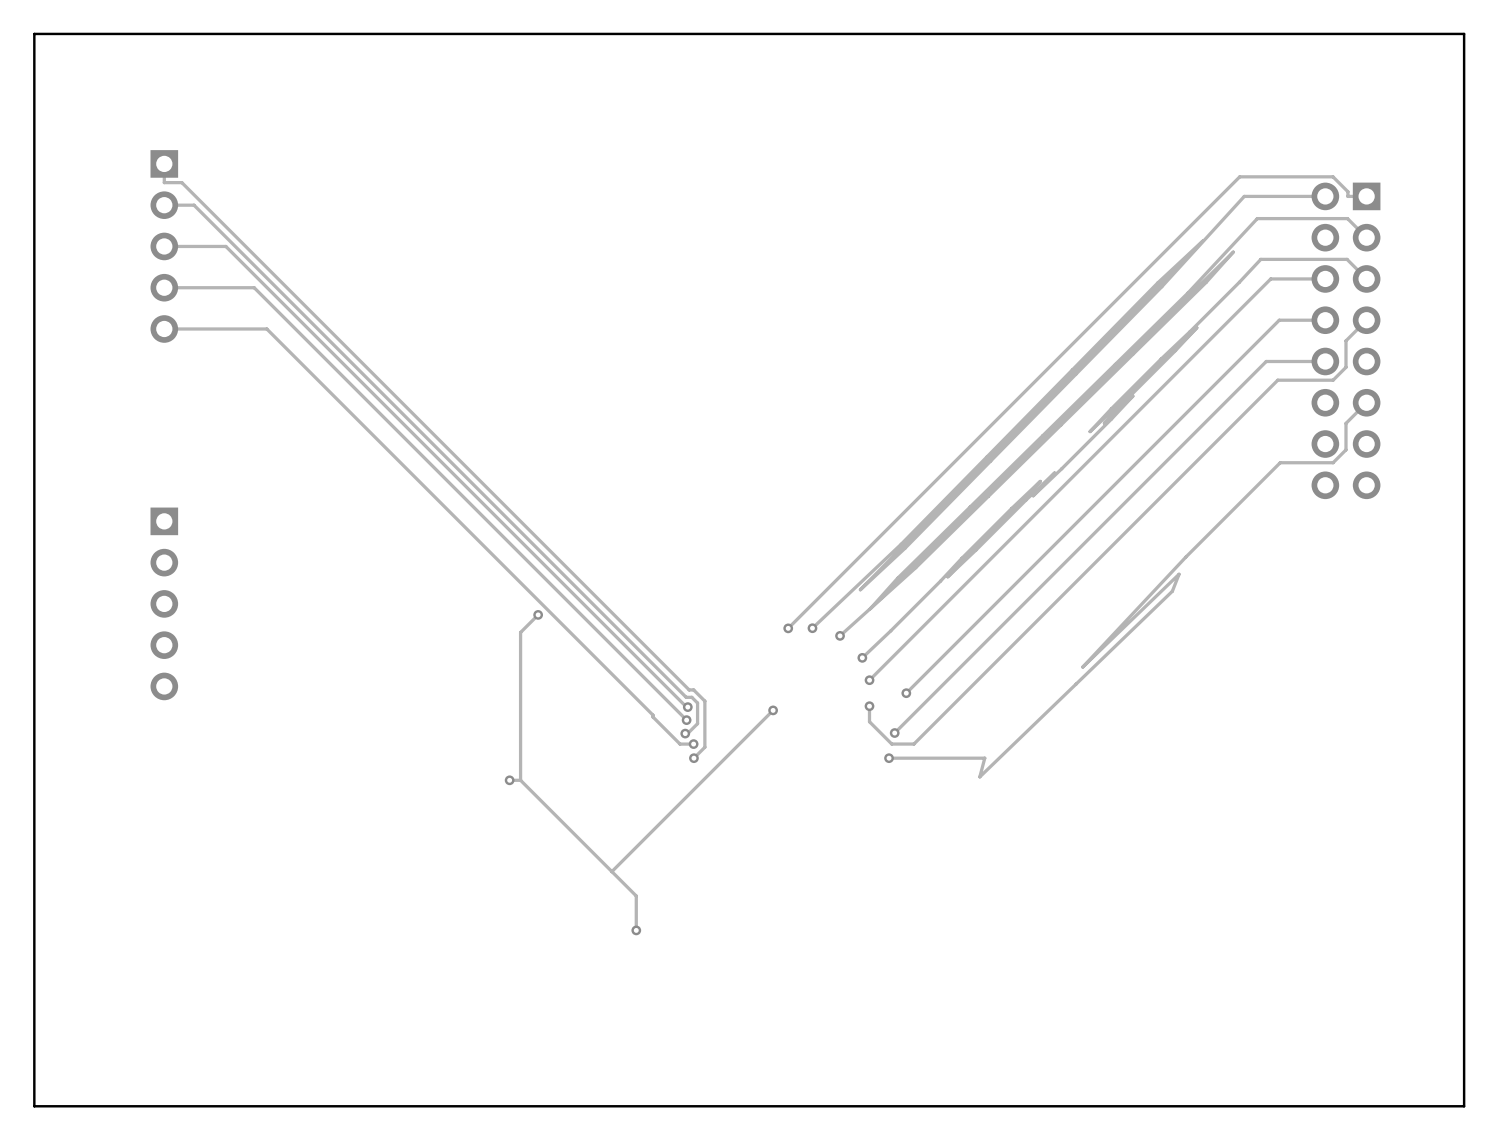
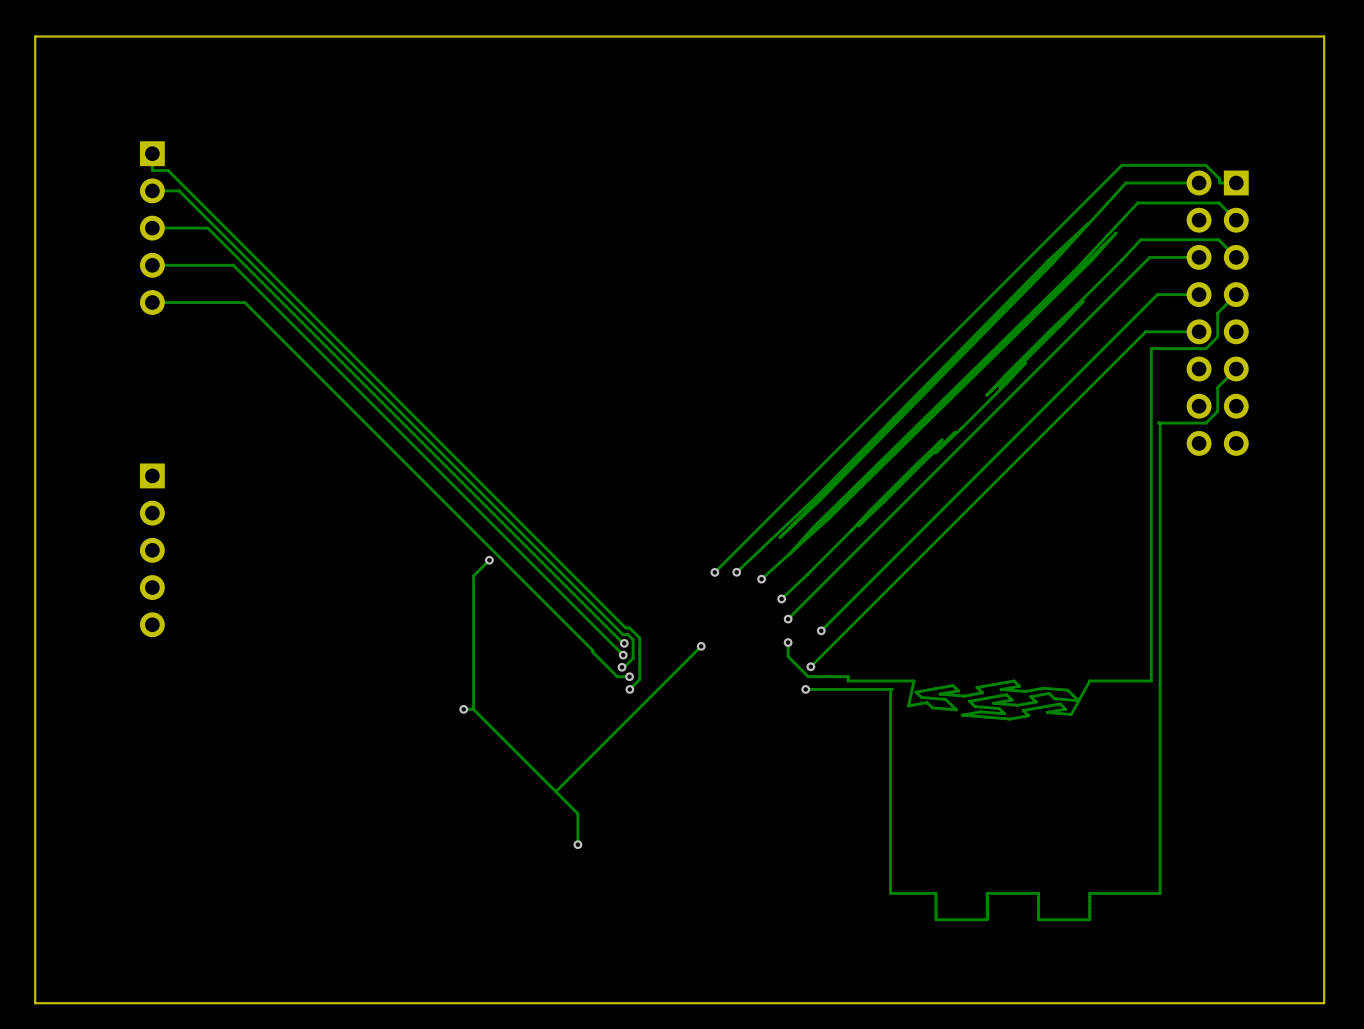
track: (1277, 380) (913, 744) -> (1156, 348) (1151, 348) (1151, 680) (1089, 680) (1071, 714) (1047, 712) (1065, 709) (1060, 703) (1023, 710) (1028, 715) (1010, 719) (962, 715) (980, 711) (1004, 713) (999, 708) (975, 706) (969, 701) (1006, 694) (1012, 700) (993, 703) (1017, 705) (1036, 702) (1030, 696) (1049, 693) (1054, 698) (1078, 700) (1067, 690) (1043, 688) (1025, 691) (1001, 689) (1019, 686) (1014, 680) (977, 687) (982, 692) (964, 696) (939, 694) (958, 690) (952, 685) (915, 692) (921, 697) (945, 699) (956, 709) (932, 707) (927, 702) (908, 705) (914, 680) (848, 680) (848, 676) (828, 676)
track: (1280, 462) (1185, 557) (1082, 667) (1179, 574) (1172, 591) (979, 776) (984, 758) -> none
track: none -> (1160, 423) (1160, 893) (1089, 893) (1089, 919) (1038, 919) (1038, 893) (987, 893) (987, 919) (936, 919) (936, 893) (890, 893) (890, 689)

